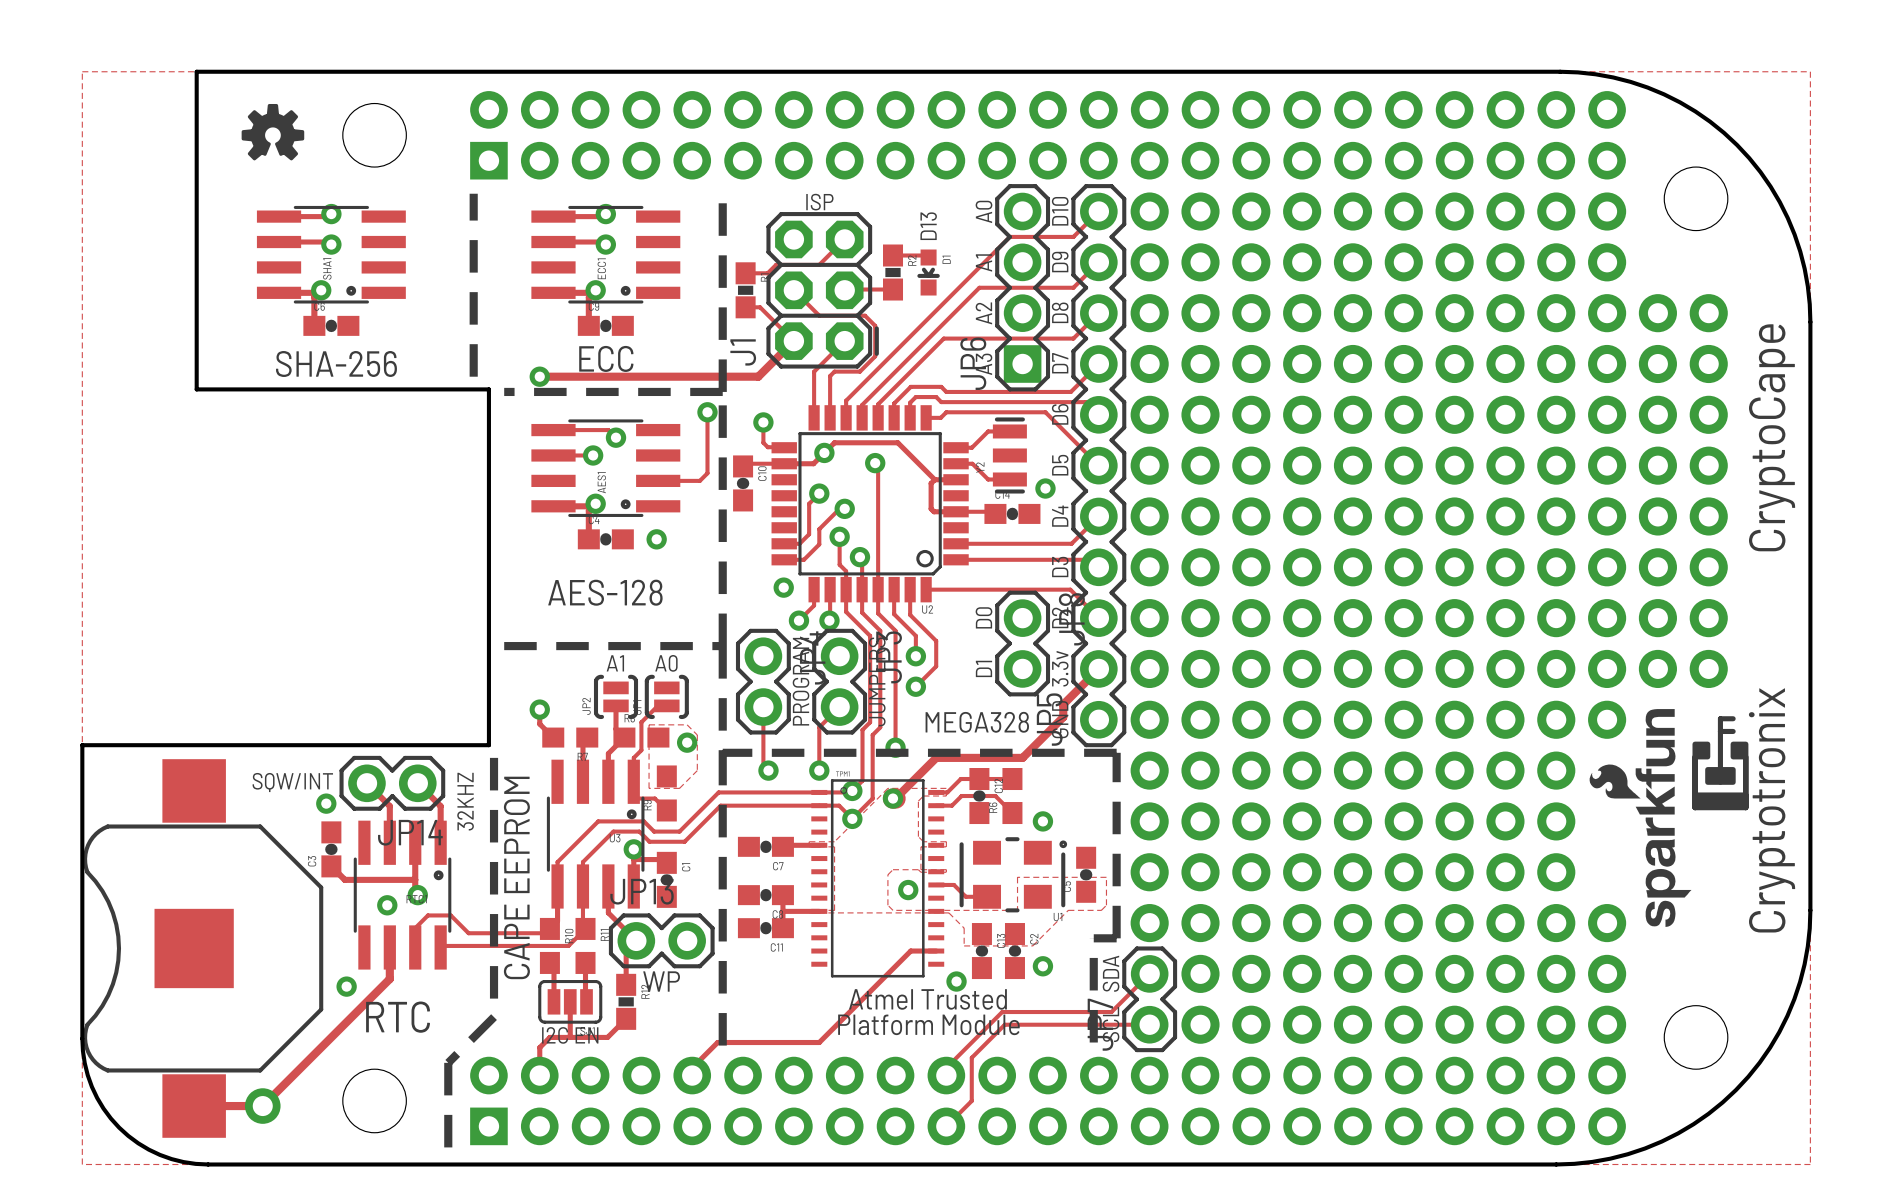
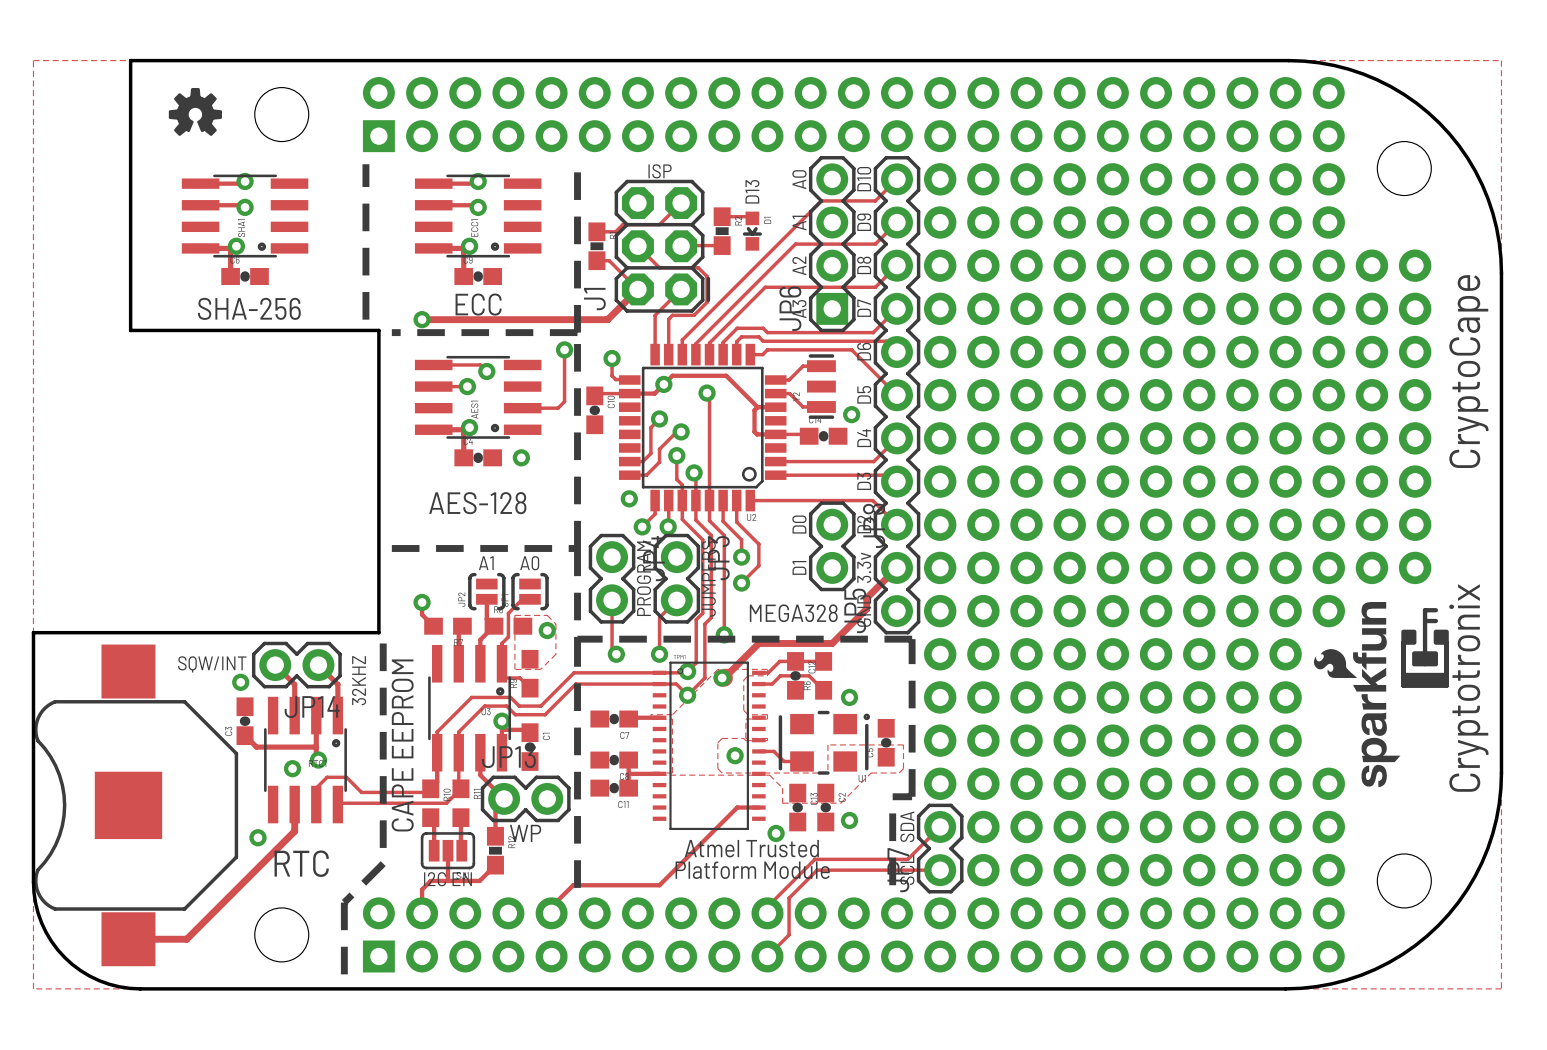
via: (262, 1106) -> none

